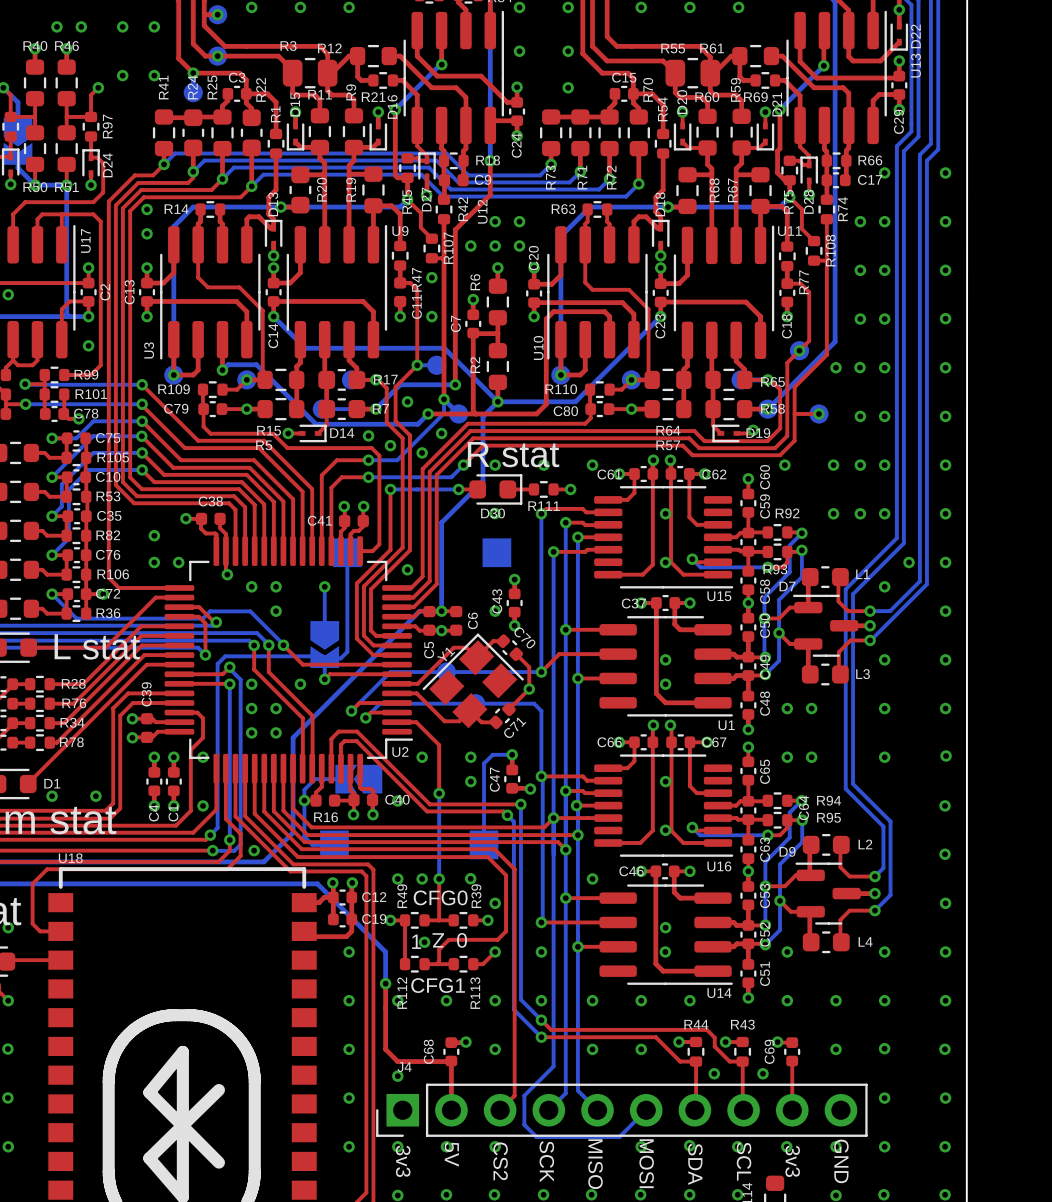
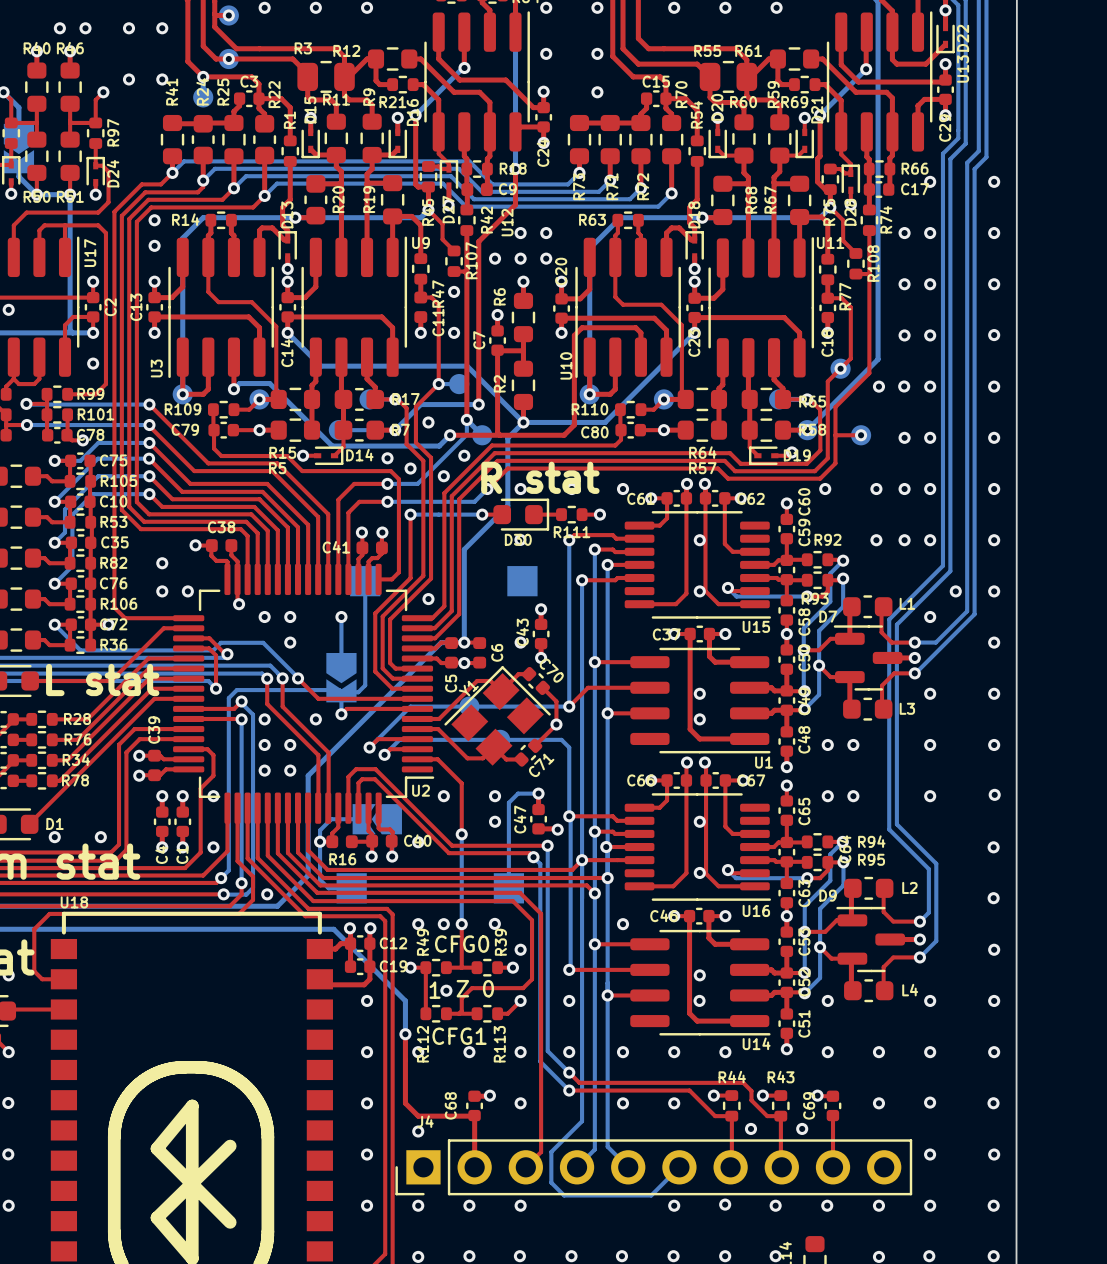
text: 5V (451, 1154) -> none
text: 3v3 (403, 1161) -> none
text: CS2 (500, 1161) -> none
text: SCK (546, 1161) -> none
text: SCL (744, 1161) -> none
text: 3v3 (792, 1161) -> none
text: GND (841, 1161) -> none
text: MOSI (646, 1163) -> none
text: MISO (595, 1164) -> none
text: SDA (695, 1164) -> none

